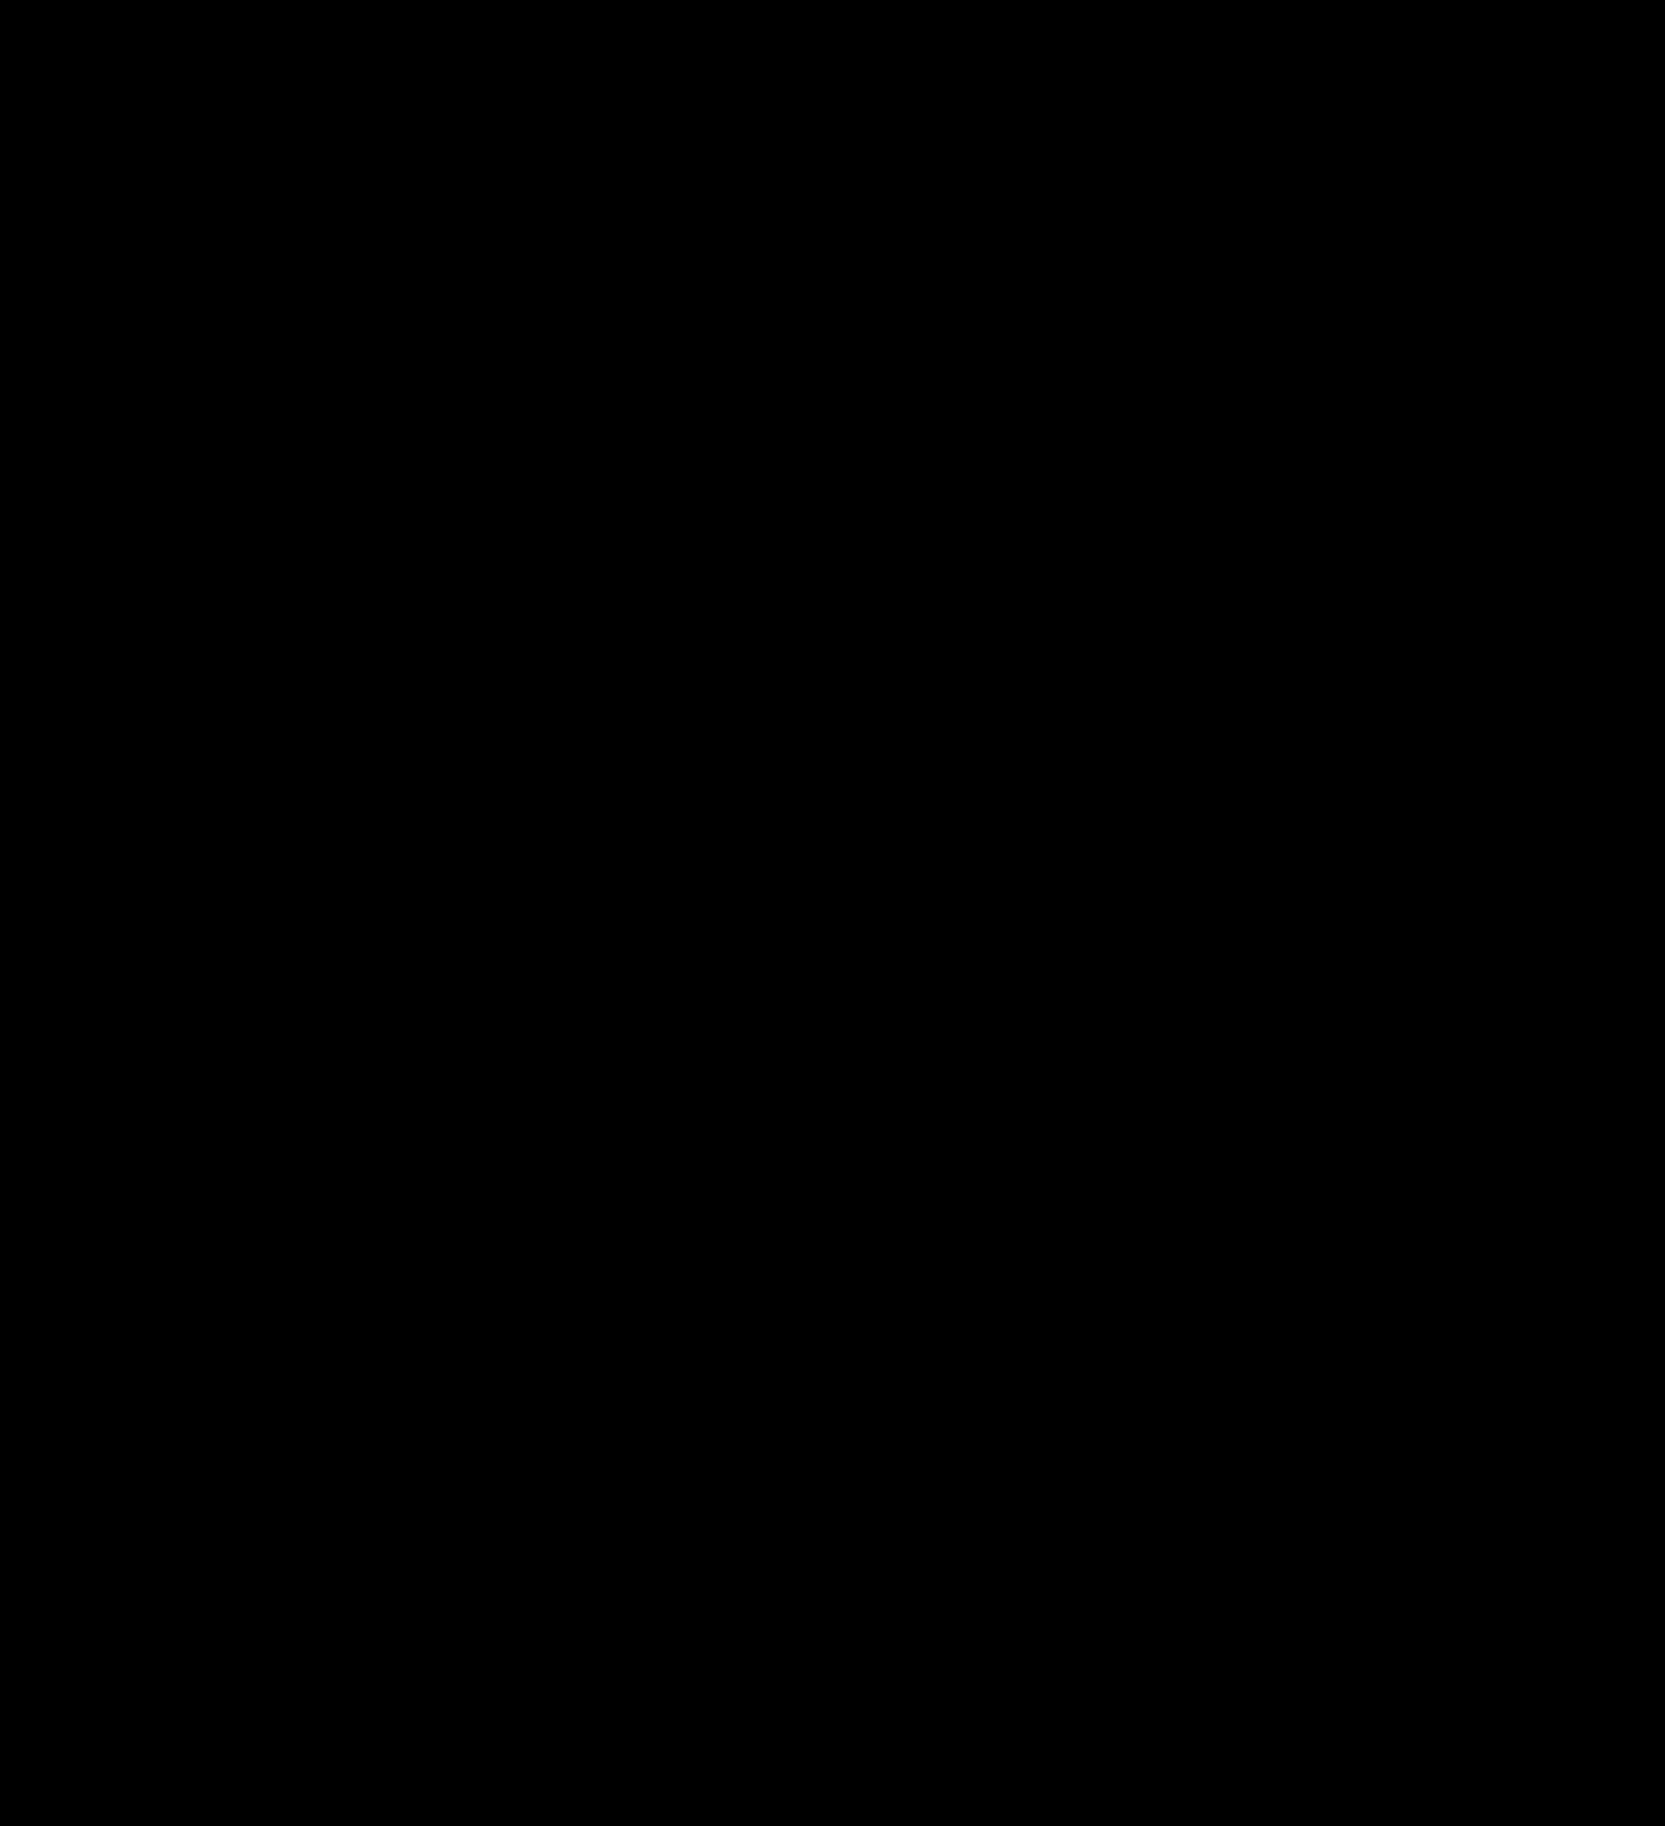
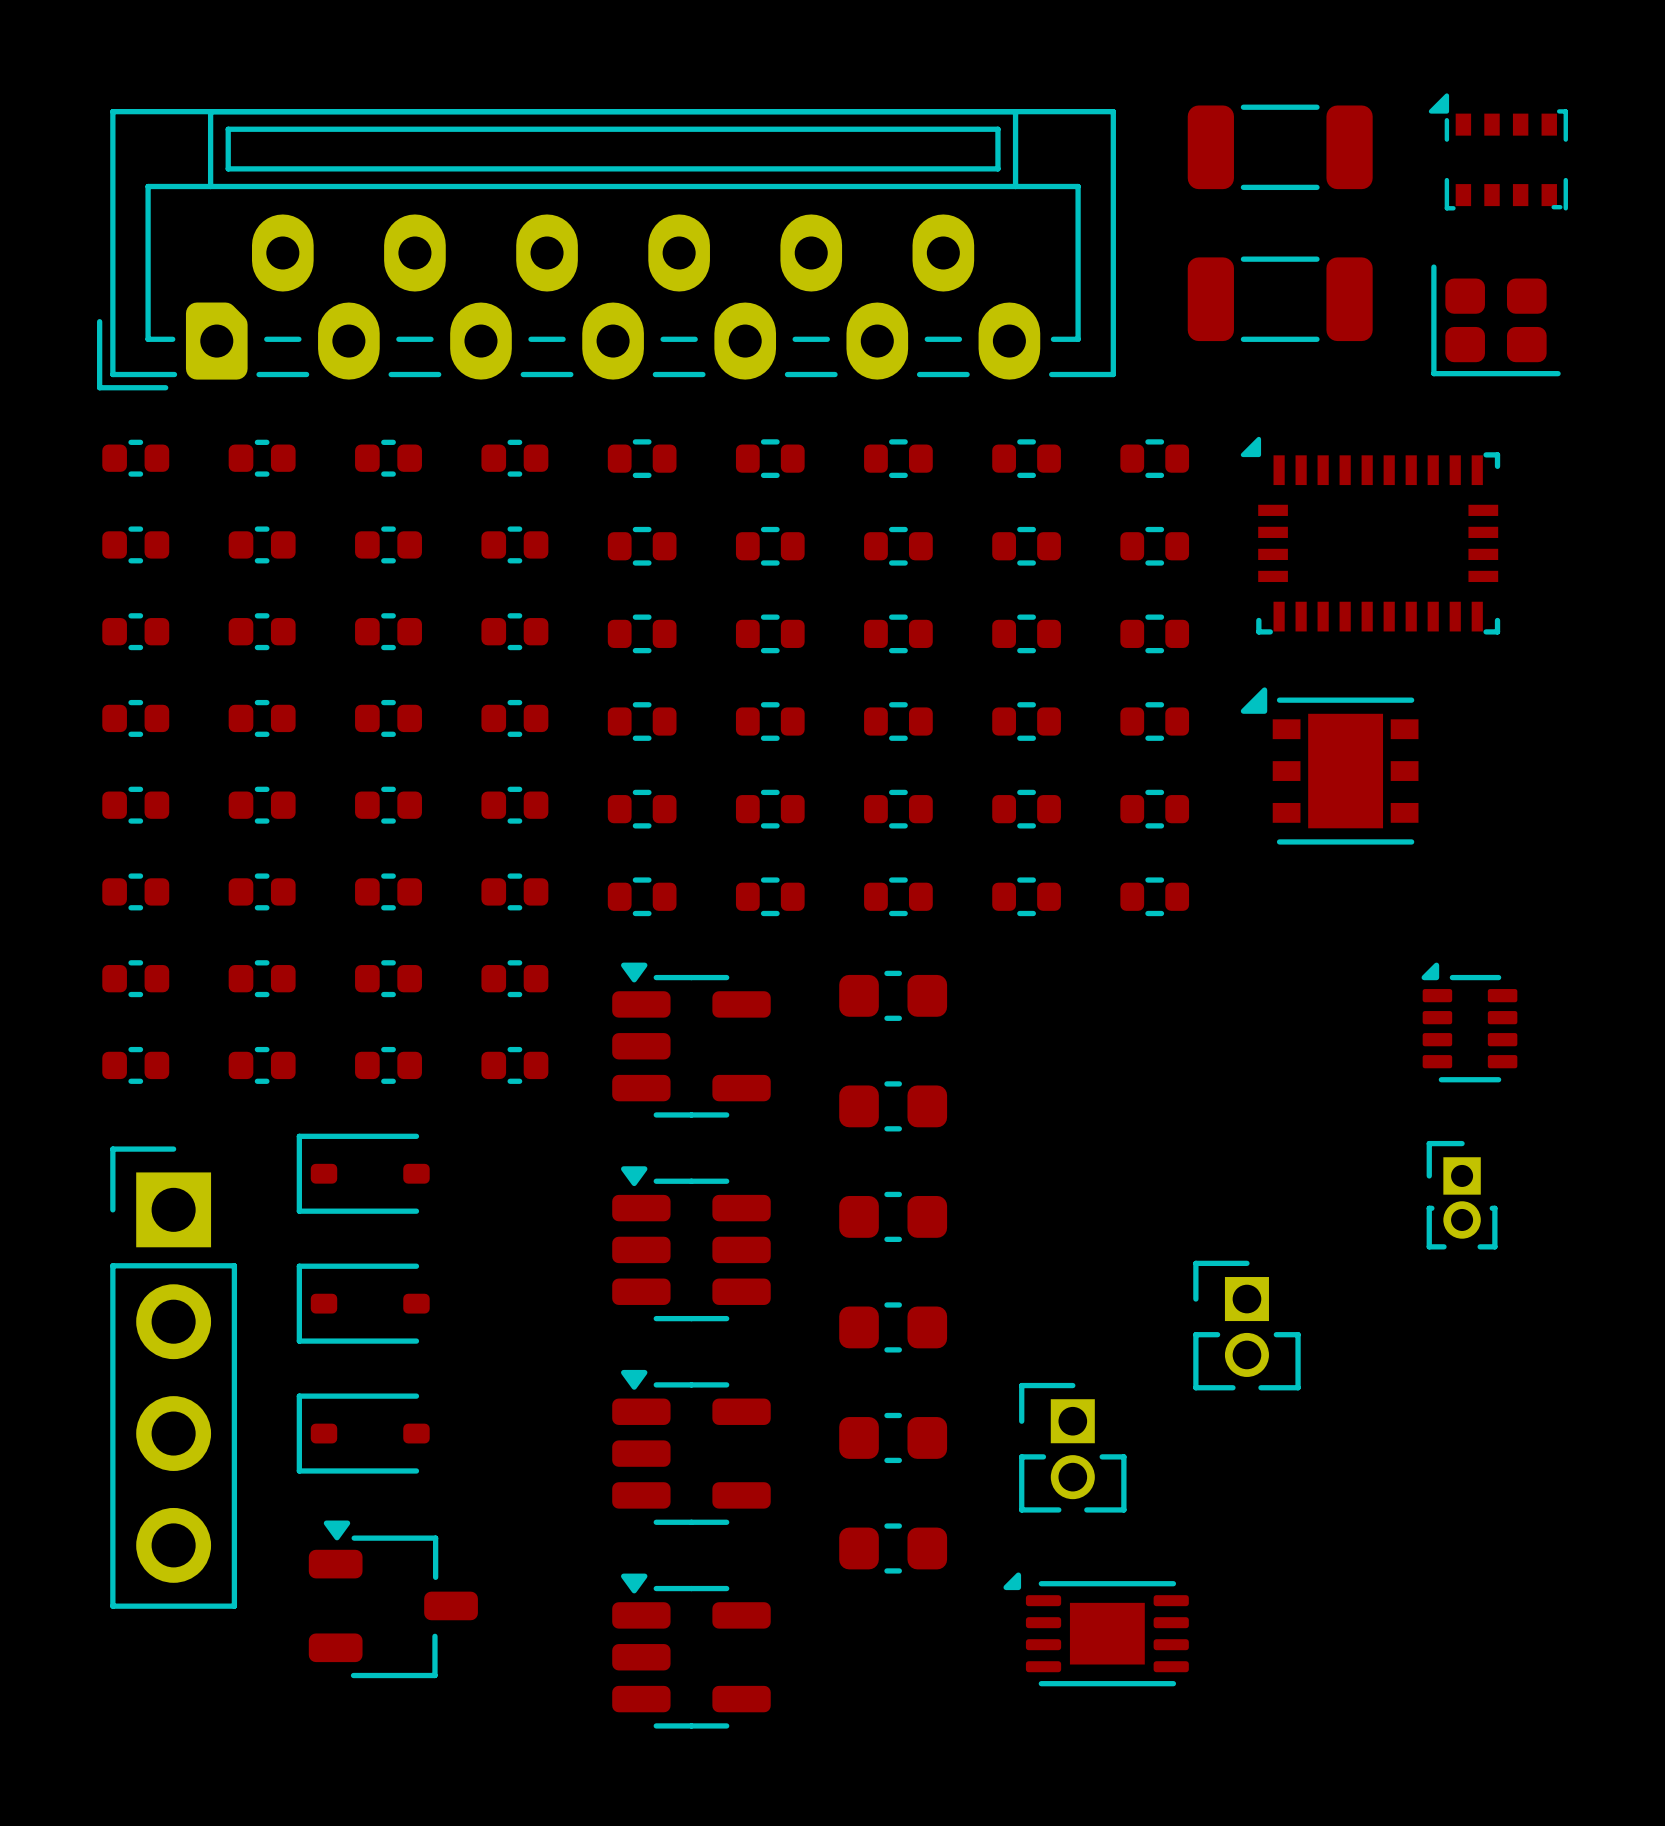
part: none -> (1280, 147)
part: none -> (1498, 151)
part: none -> (606, 249)
part: none -> (1280, 299)
part: none -> (1495, 320)
part: none -> (135, 458)
part: none -> (262, 458)
part: none -> (388, 458)
part: none -> (514, 458)
part: none -> (642, 458)
part: none -> (770, 458)
part: none -> (898, 458)
part: none -> (1026, 458)
part: none -> (1154, 458)
part: none -> (1370, 535)
part: none -> (135, 544)
part: none -> (262, 544)
part: none -> (388, 544)
part: none -> (514, 544)
part: none -> (642, 546)
part: none -> (770, 546)
part: none -> (898, 546)
part: none -> (1026, 546)
part: none -> (1154, 546)
part: none -> (135, 631)
part: none -> (262, 631)
part: none -> (388, 631)
part: none -> (514, 631)
part: none -> (642, 633)
part: none -> (770, 633)
part: none -> (898, 633)
part: none -> (1026, 633)
part: none -> (1154, 633)
part: none -> (135, 718)
part: none -> (262, 718)
part: none -> (388, 718)
part: none -> (514, 718)
part: none -> (642, 721)
part: none -> (770, 721)
part: none -> (898, 721)
part: none -> (1026, 721)
part: none -> (1154, 721)
part: none -> (1329, 765)
part: none -> (135, 805)
part: none -> (262, 805)
part: none -> (388, 805)
part: none -> (514, 805)
part: none -> (642, 809)
part: none -> (770, 809)
part: none -> (898, 809)
part: none -> (1026, 809)
part: none -> (1154, 809)
part: none -> (135, 891)
part: none -> (262, 891)
part: none -> (388, 891)
part: none -> (514, 891)
part: none -> (642, 896)
part: none -> (770, 896)
part: none -> (898, 896)
part: none -> (1026, 896)
part: none -> (1154, 896)
part: none -> (135, 978)
part: none -> (262, 978)
part: none -> (388, 978)
part: none -> (514, 978)
part: none -> (893, 995)
part: none -> (1469, 1022)
part: none -> (691, 1040)
part: none -> (135, 1065)
part: none -> (262, 1065)
part: none -> (388, 1065)
part: none -> (514, 1065)
part: none -> (893, 1106)
part: none -> (363, 1173)
part: none -> (1462, 1195)
part: none -> (893, 1216)
part: none -> (691, 1243)
part: none -> (363, 1303)
part: none -> (1246, 1325)
part: none -> (893, 1327)
part: none -> (173, 1377)
part: none -> (363, 1433)
part: none -> (893, 1437)
part: none -> (691, 1447)
part: none -> (1072, 1447)
part: none -> (893, 1548)
part: none -> (393, 1599)
part: none -> (1096, 1629)
part: none -> (691, 1651)

